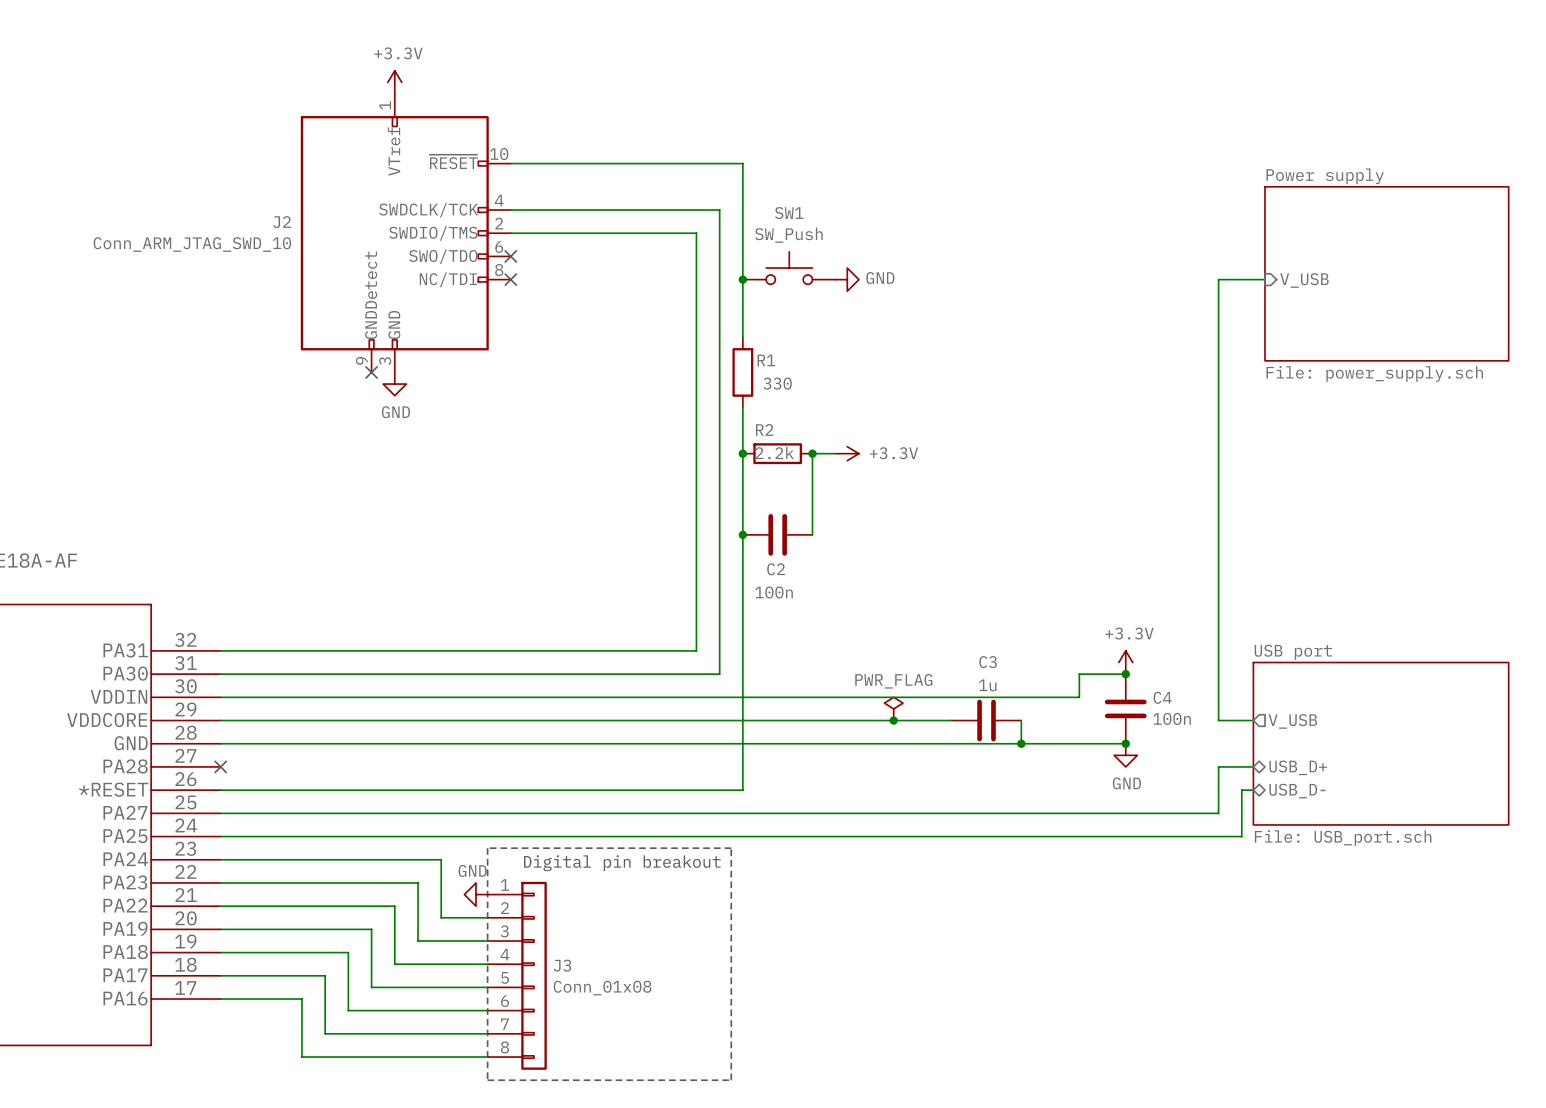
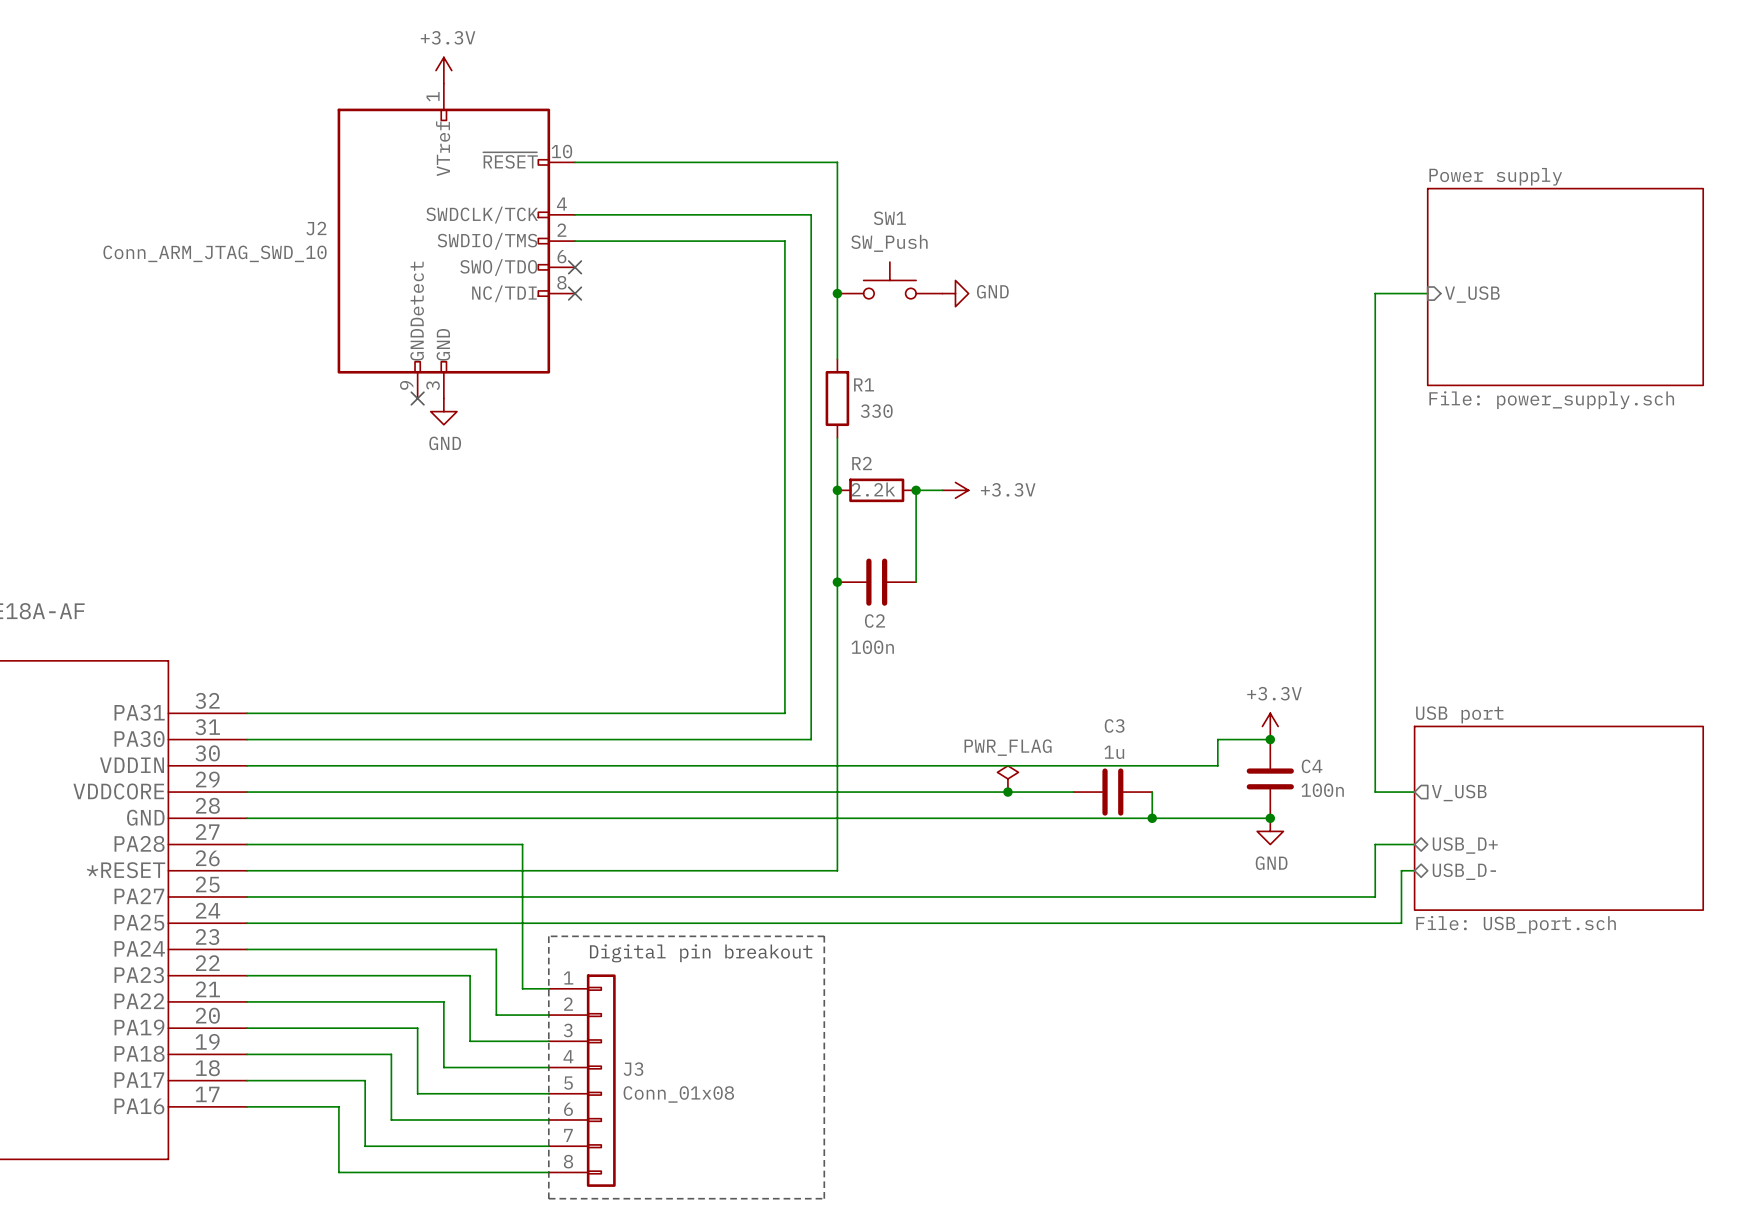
wire: none -> (247, 844) (522, 844) (522, 988) (548, 988)
no-connect mark: (220, 766) -> none
power symbol: GND (476, 894) -> none

